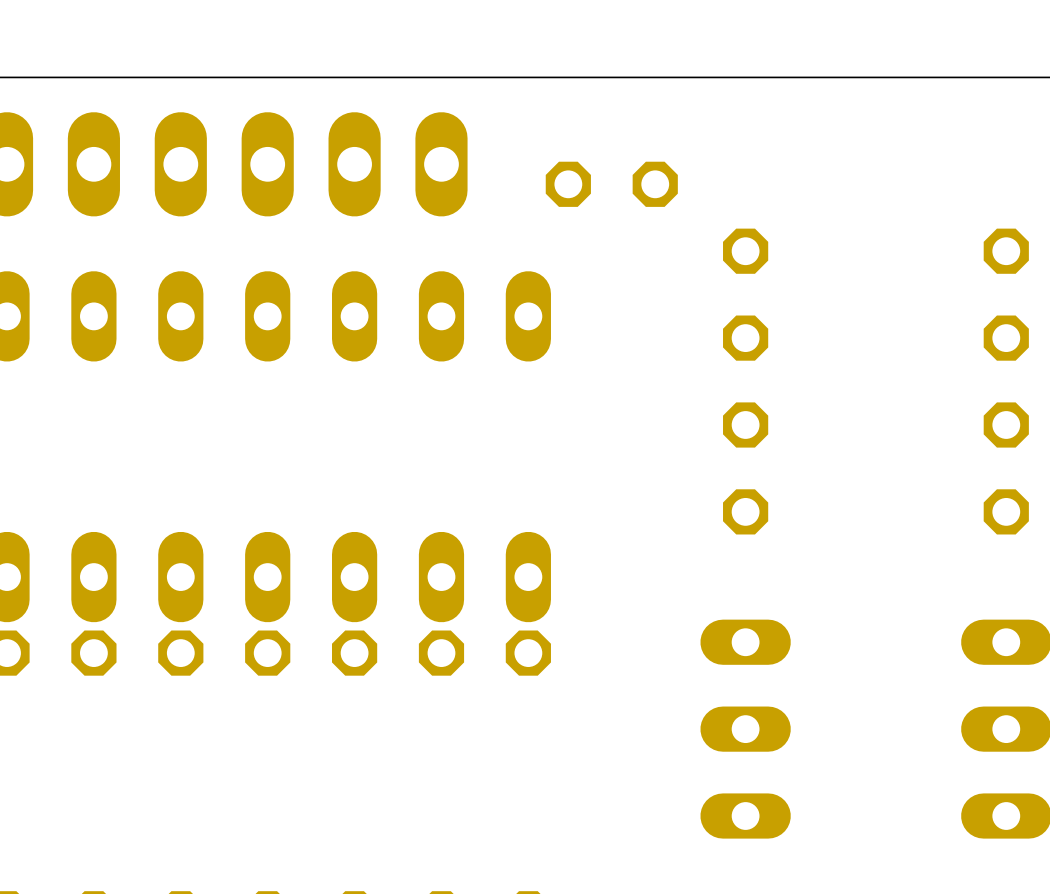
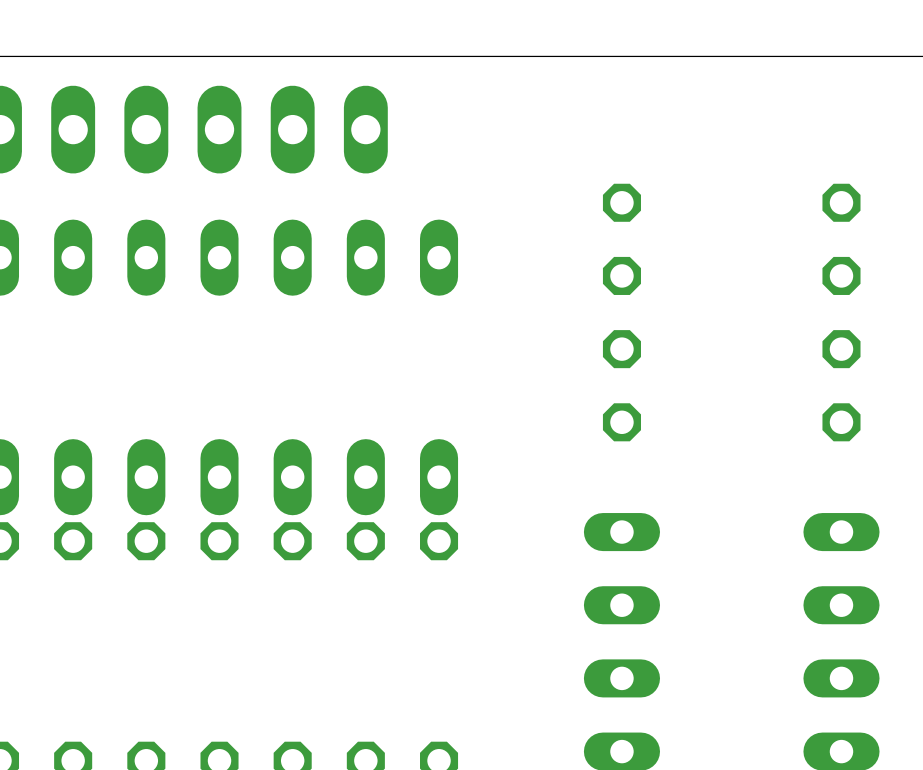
part: (611, 184) -> none

